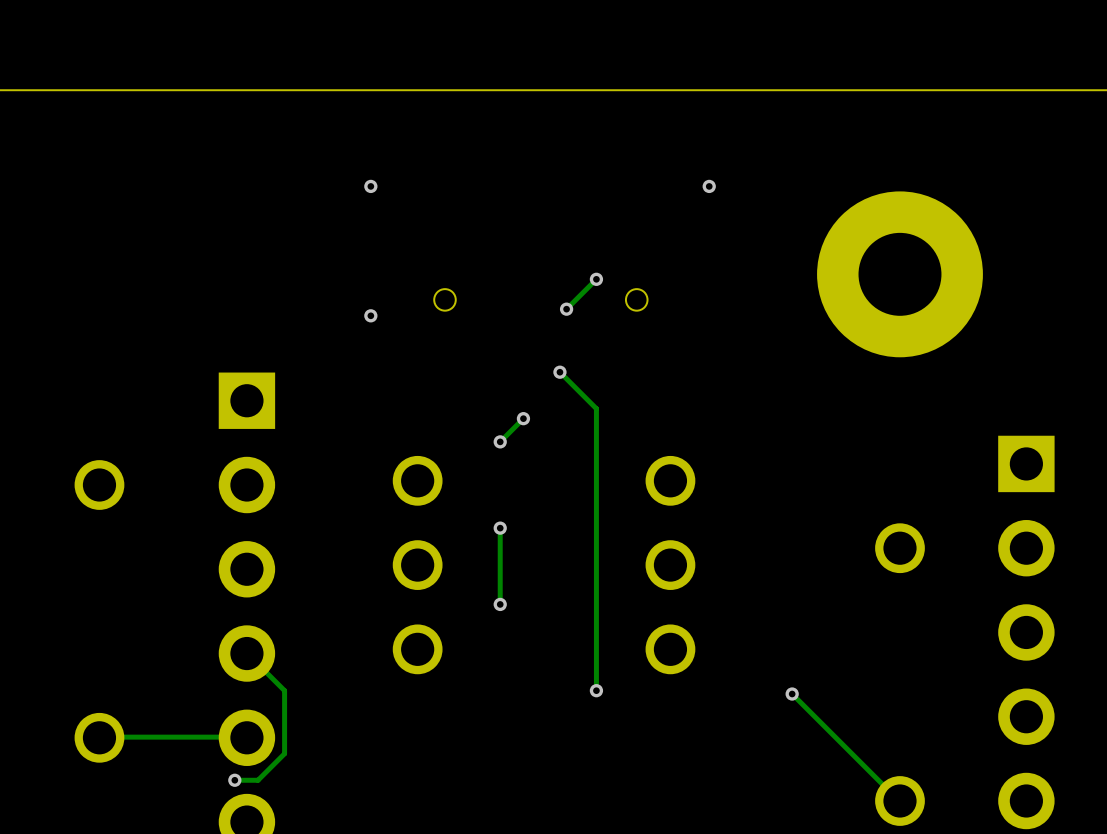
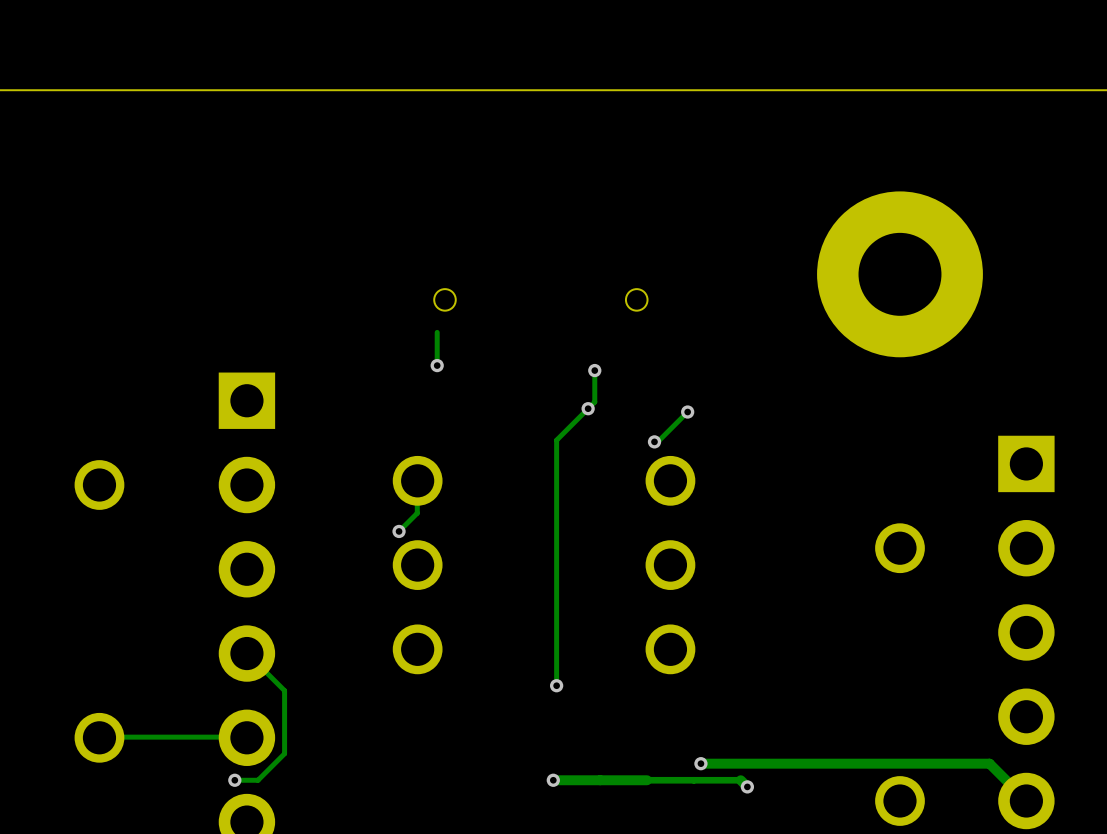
via: (370, 186) -> none
via: (709, 186) -> none
track: (596, 279) (566, 309) -> none
via: (596, 279) -> none
via: (566, 309) -> none
via: (370, 315) -> none
track: none -> (437, 332) (437, 365)
via: none -> (437, 365)
track: none -> (594, 370) (594, 402) (556, 440) (556, 685)
via: none -> (594, 370)
track: (559, 372) (596, 408) (596, 690) -> none
via: (559, 372) -> none
via: none -> (588, 408)
track: none -> (687, 412) (657, 441) (654, 441)
via: none -> (687, 412)
track: (523, 418) (500, 441) -> none
via: (523, 418) -> none
via: (500, 441) -> none
via: none -> (654, 441)
track: none -> (417, 480) (417, 513) (399, 531)
track: (500, 528) (500, 604) -> none
via: (500, 528) -> none
via: none -> (399, 531)
via: (500, 604) -> none
via position: (596, 690) -> (556, 685)
track: (792, 694) (898, 800) -> none
via: (792, 694) -> none
track: none -> (700, 763) (989, 763) (1026, 800)
via: none -> (700, 763)
track: none -> (553, 780) (740, 780) (747, 786)
via: none -> (553, 780)
via: none -> (747, 786)

